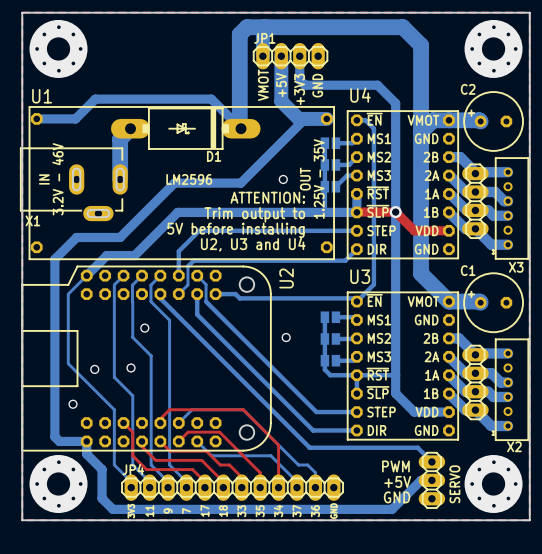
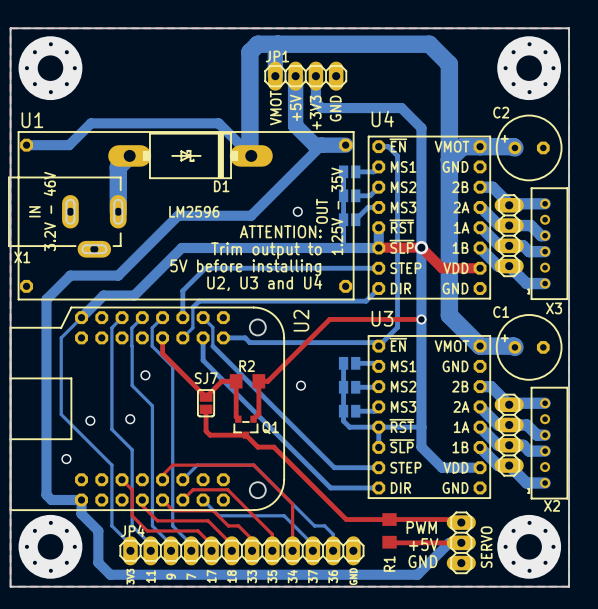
top track: none -> (421, 319) (329, 319) (267, 381) (258, 381) (258, 413) (253, 419)
via: none -> (421, 319)
bottom track: (160, 294) (160, 298) (309, 447) (417, 447) (431, 461) -> none
top track: none -> (162, 337) (162, 353) (206, 397) (221, 381) (236, 381) (236, 417) (238, 419)
R2: none -> (247, 381)
SJ7: none -> (206, 403)
top track: none -> (206, 409) (206, 431) (210, 435) (245, 435) (257, 447) (273, 447) (346, 519) (458, 519) (461, 522)
Q1: none -> (245, 427)
R1: none -> (389, 530)
top track: none -> (389, 542) (461, 542)

